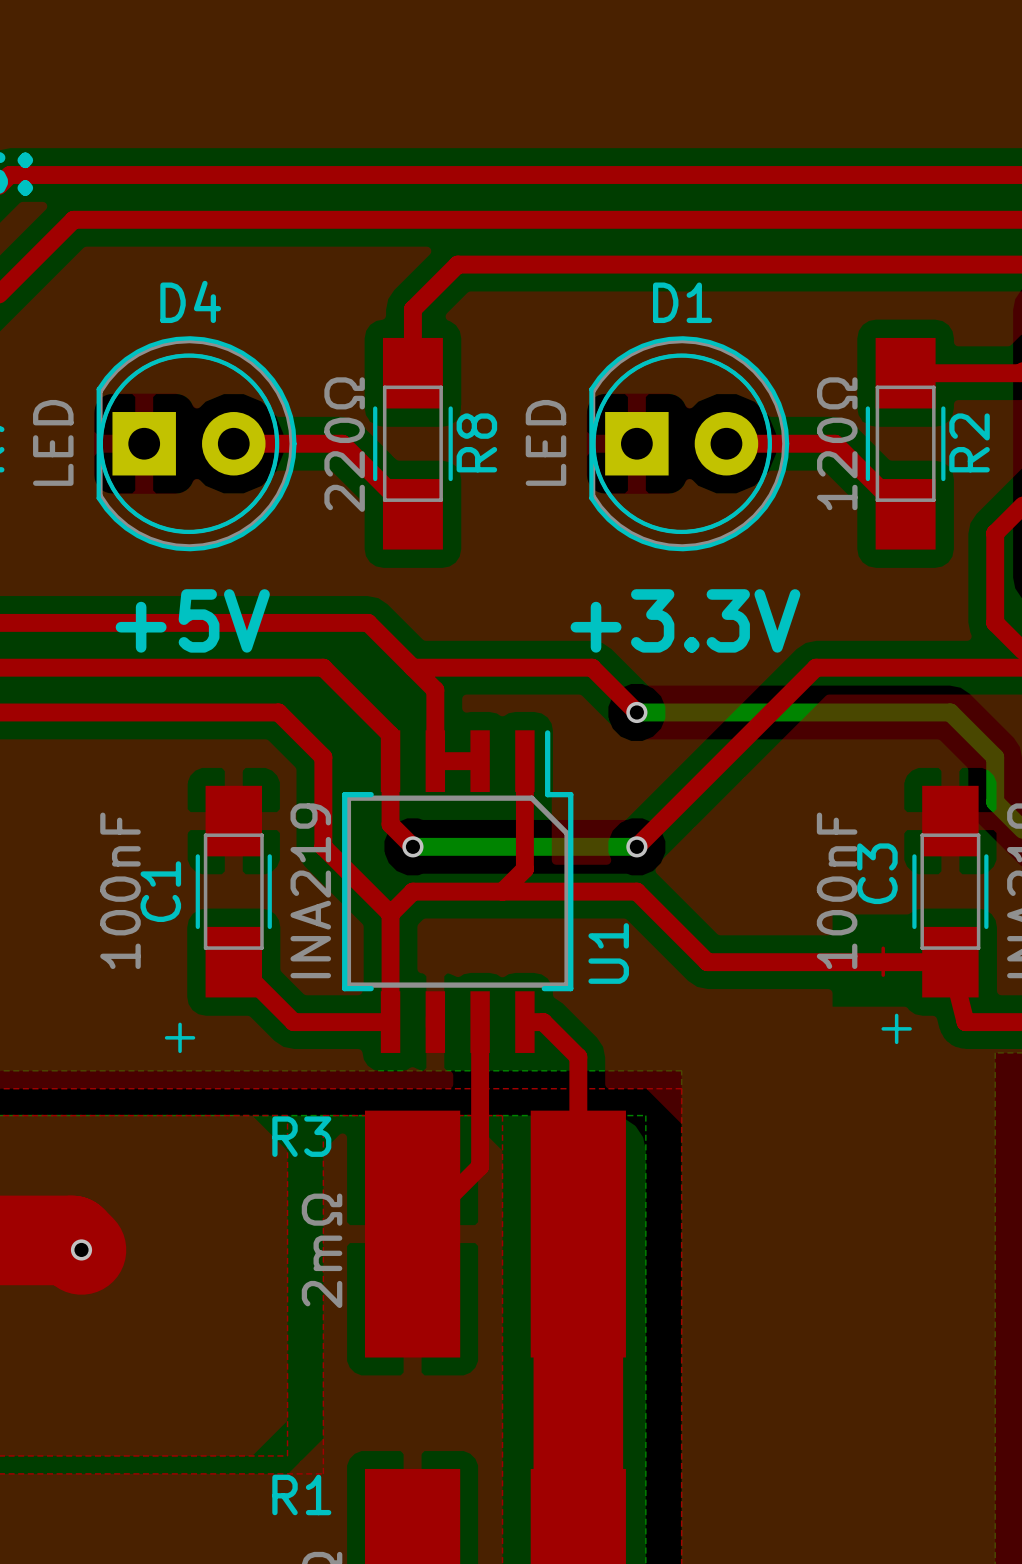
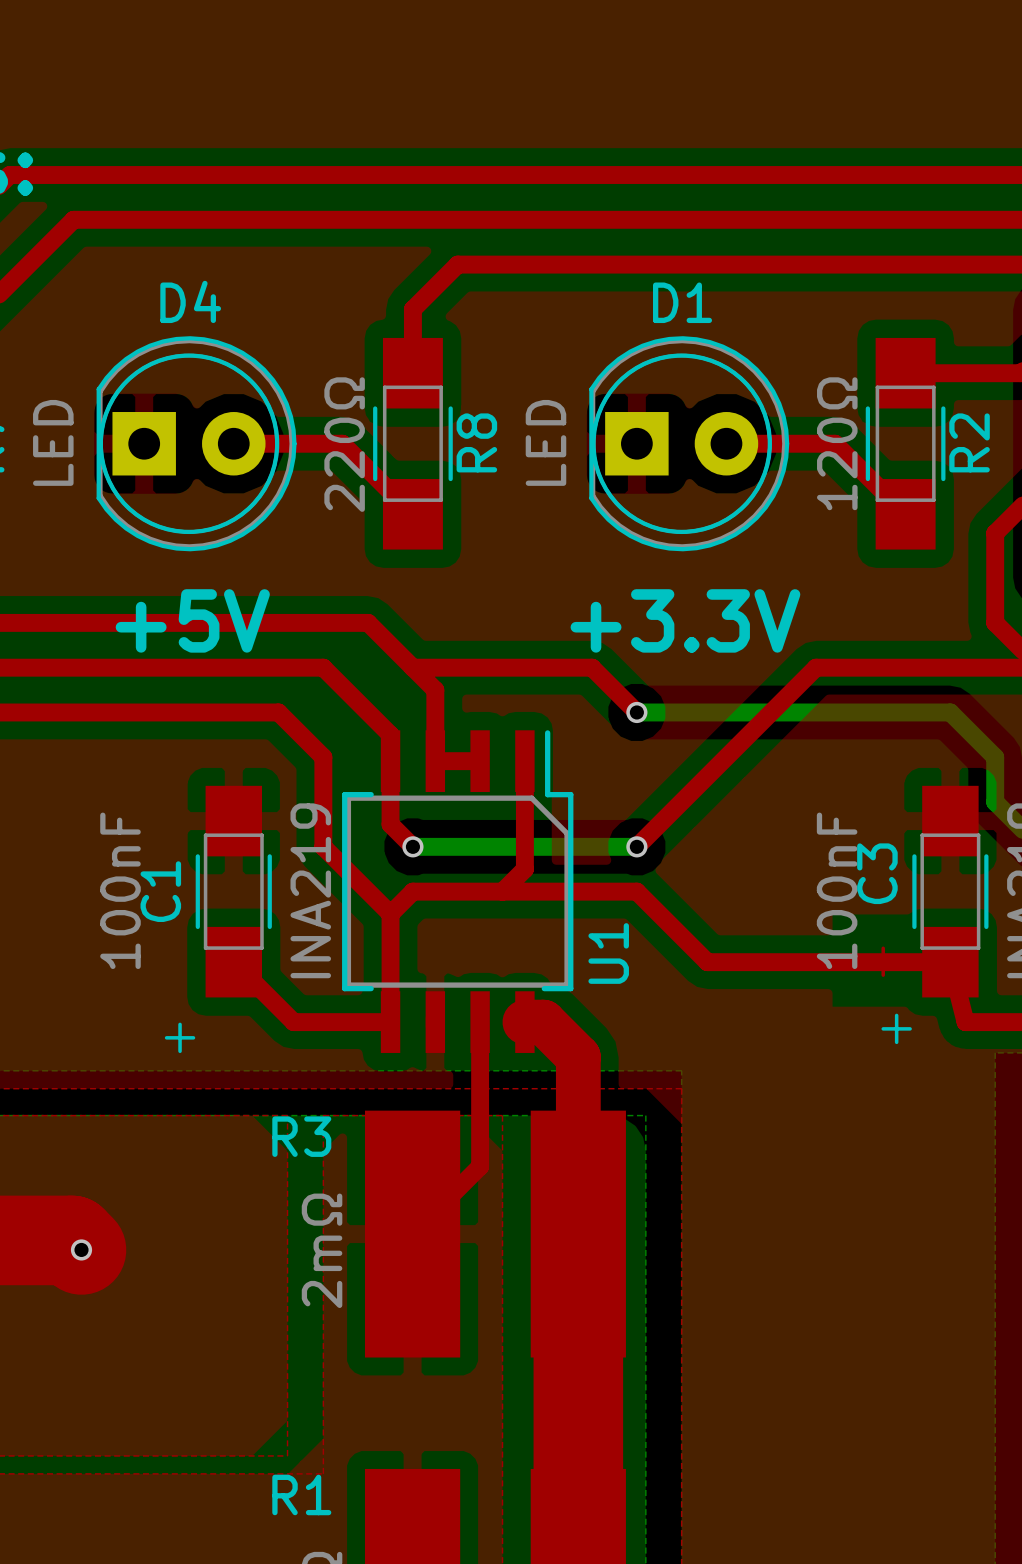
top track width: thin (524, 1022) (543, 1022) (578, 1057) (578, 1234) -> thick (524, 1022) (543, 1022) (578, 1057) (578, 1234)

